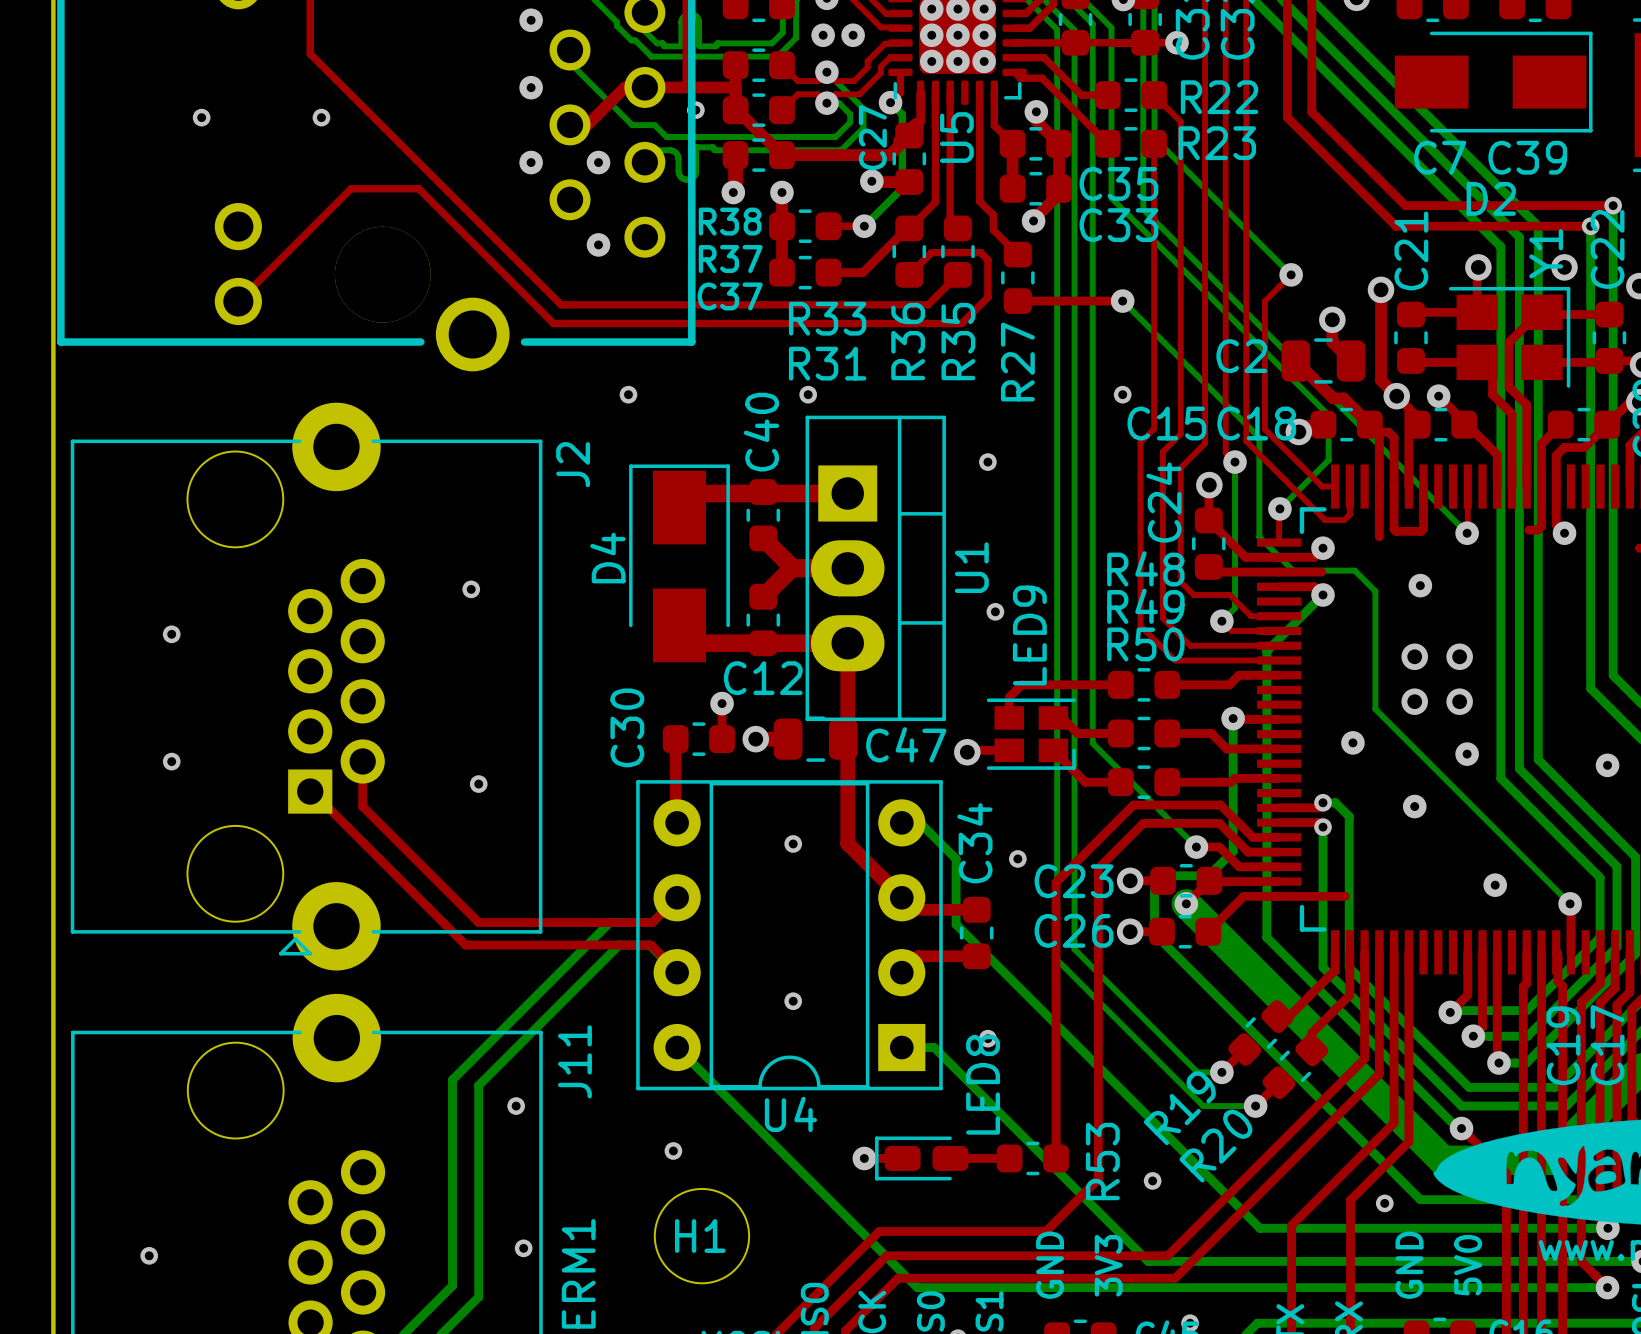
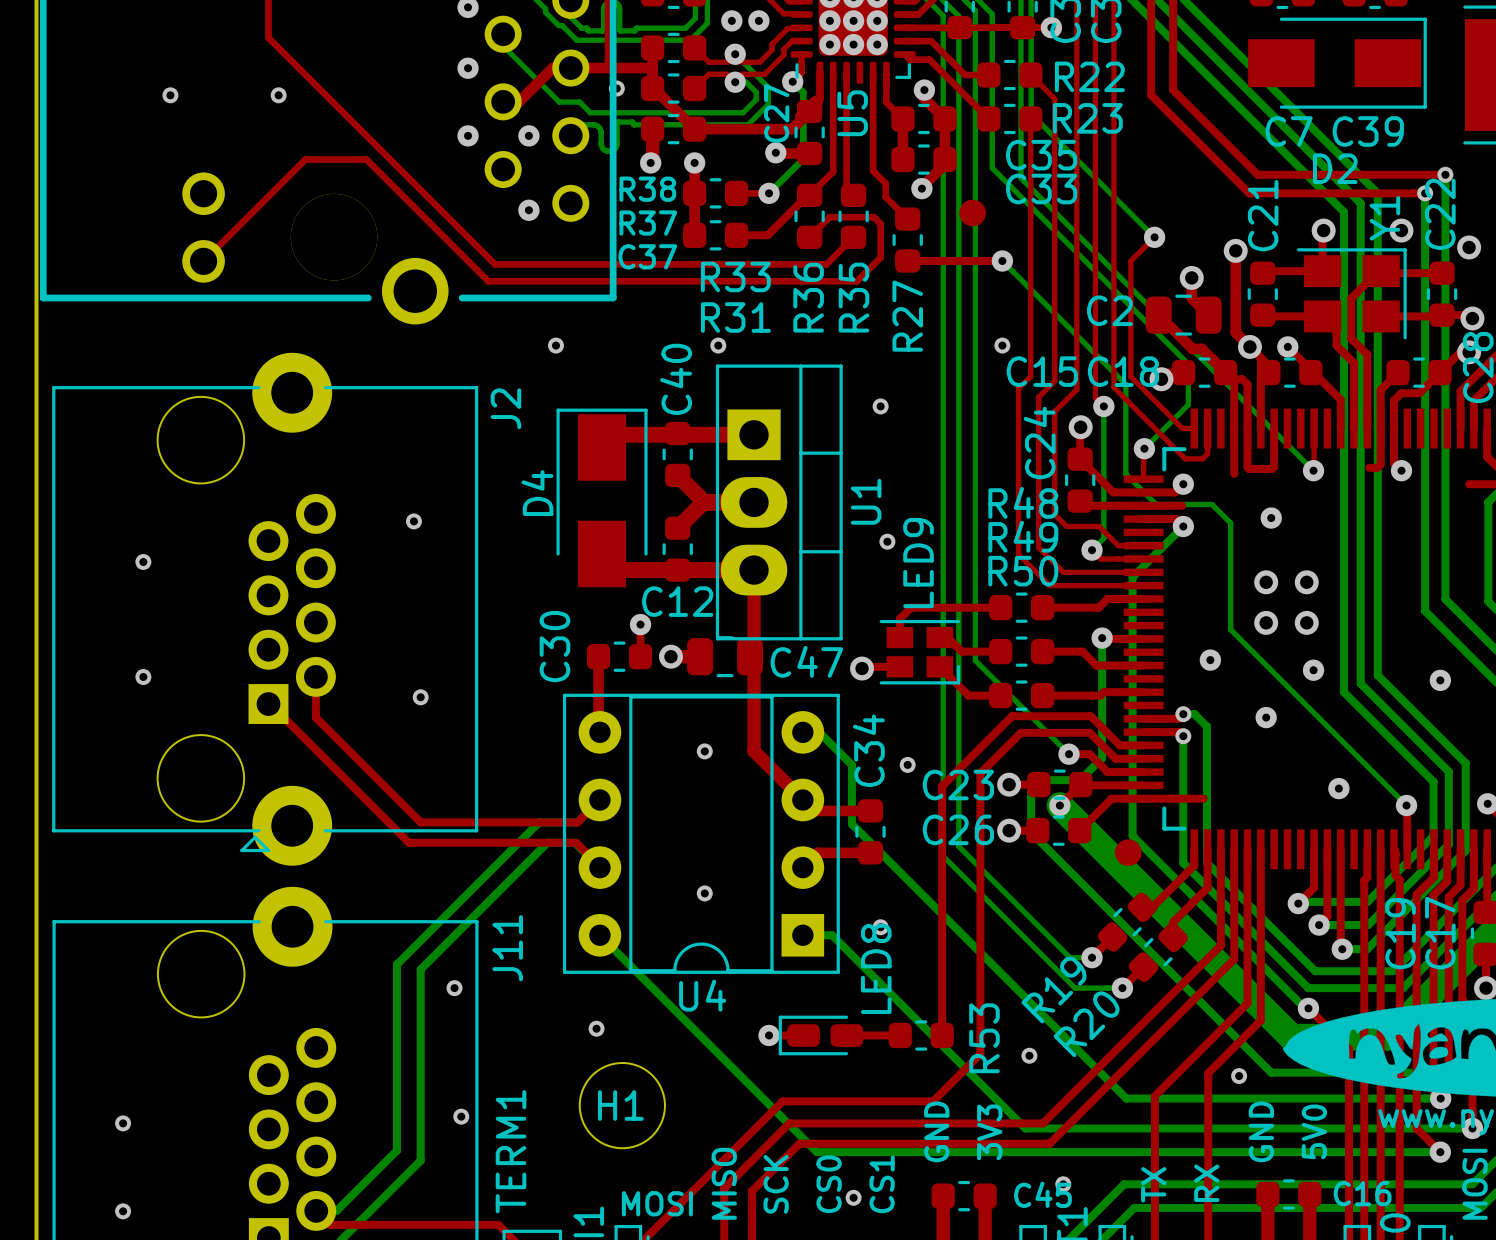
C35 name position: C35 (1118, 183) -> C35 (1041, 155)
C33 name position: C33 (1118, 225) -> C33 (1041, 188)
part: none -> (972, 212)
part: none -> (1128, 852)

